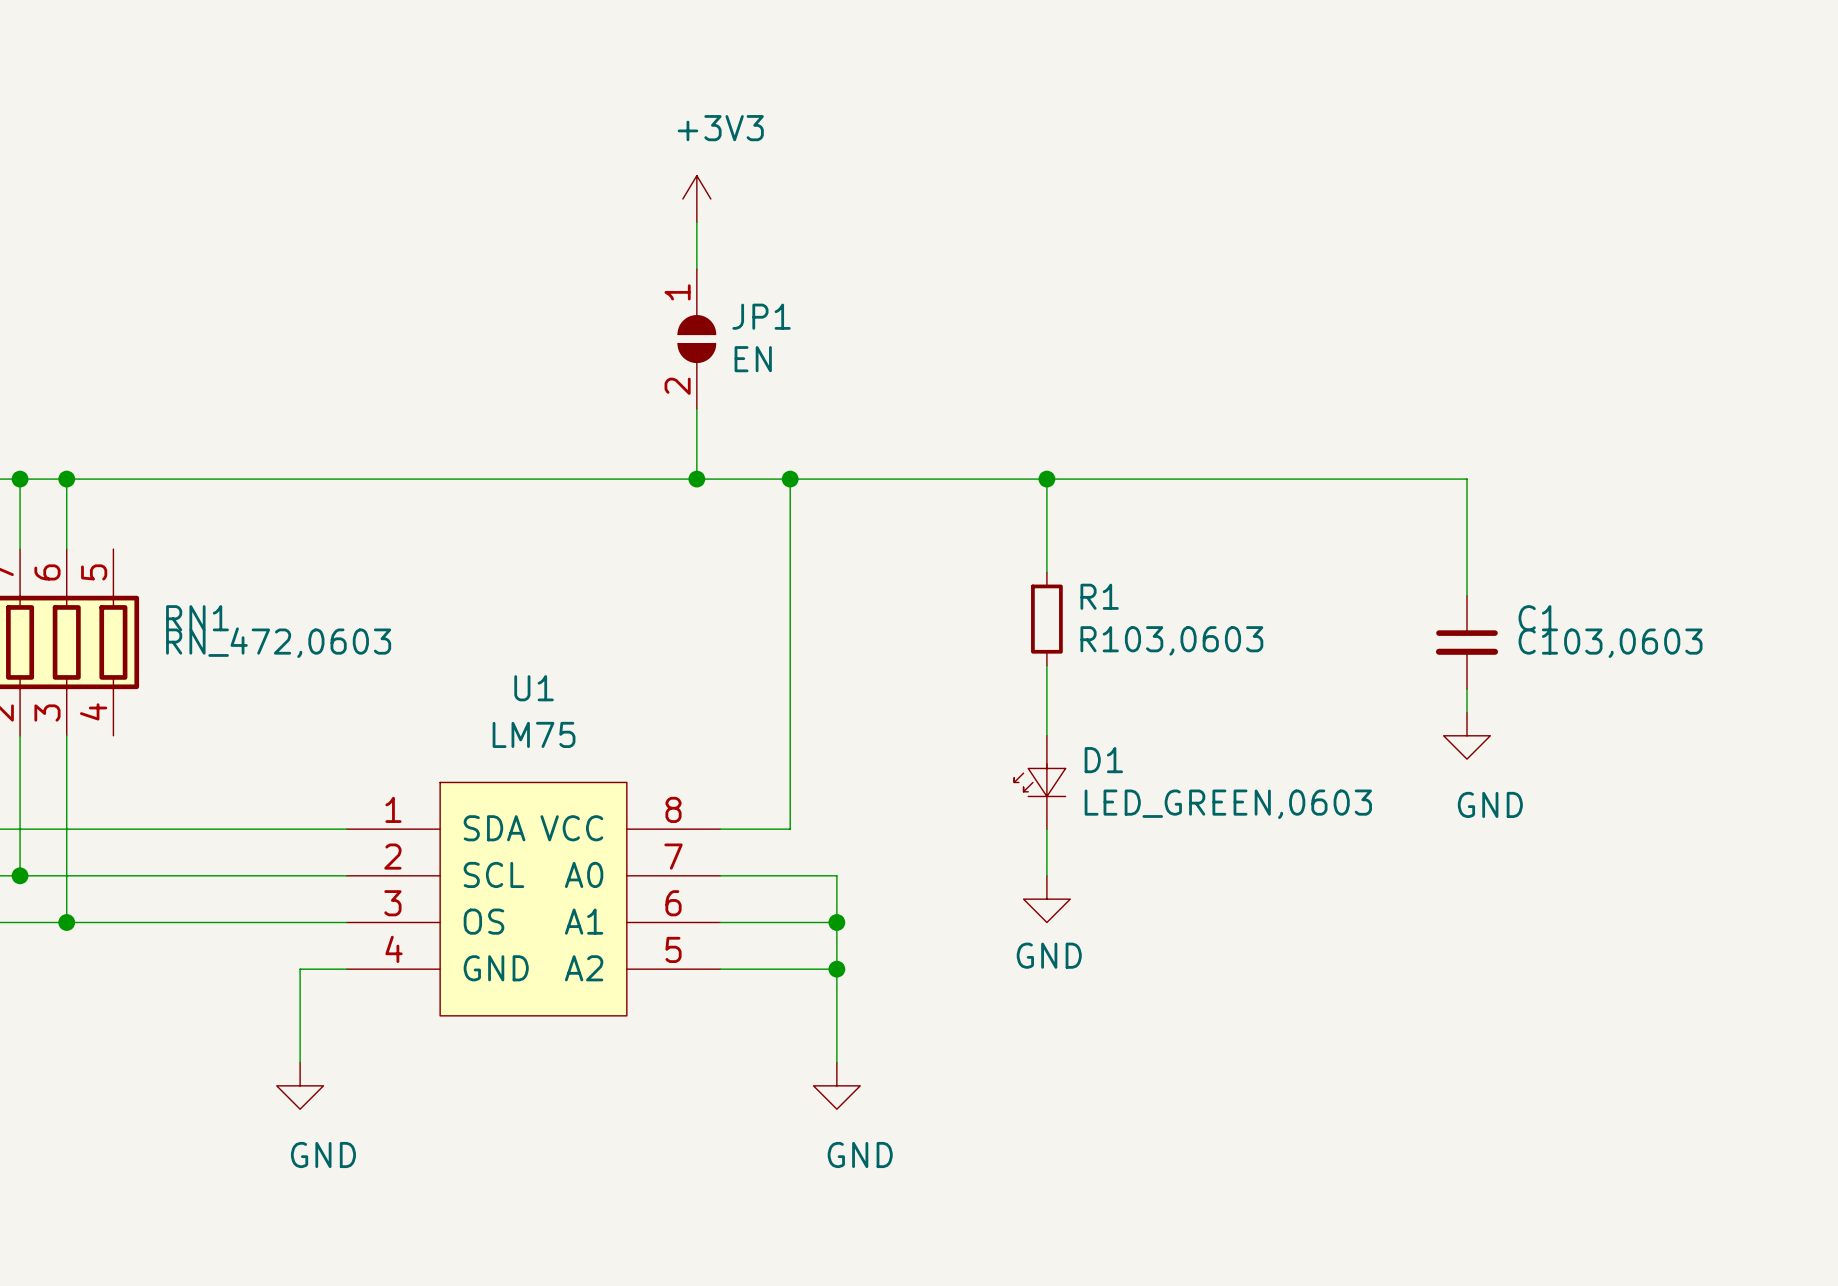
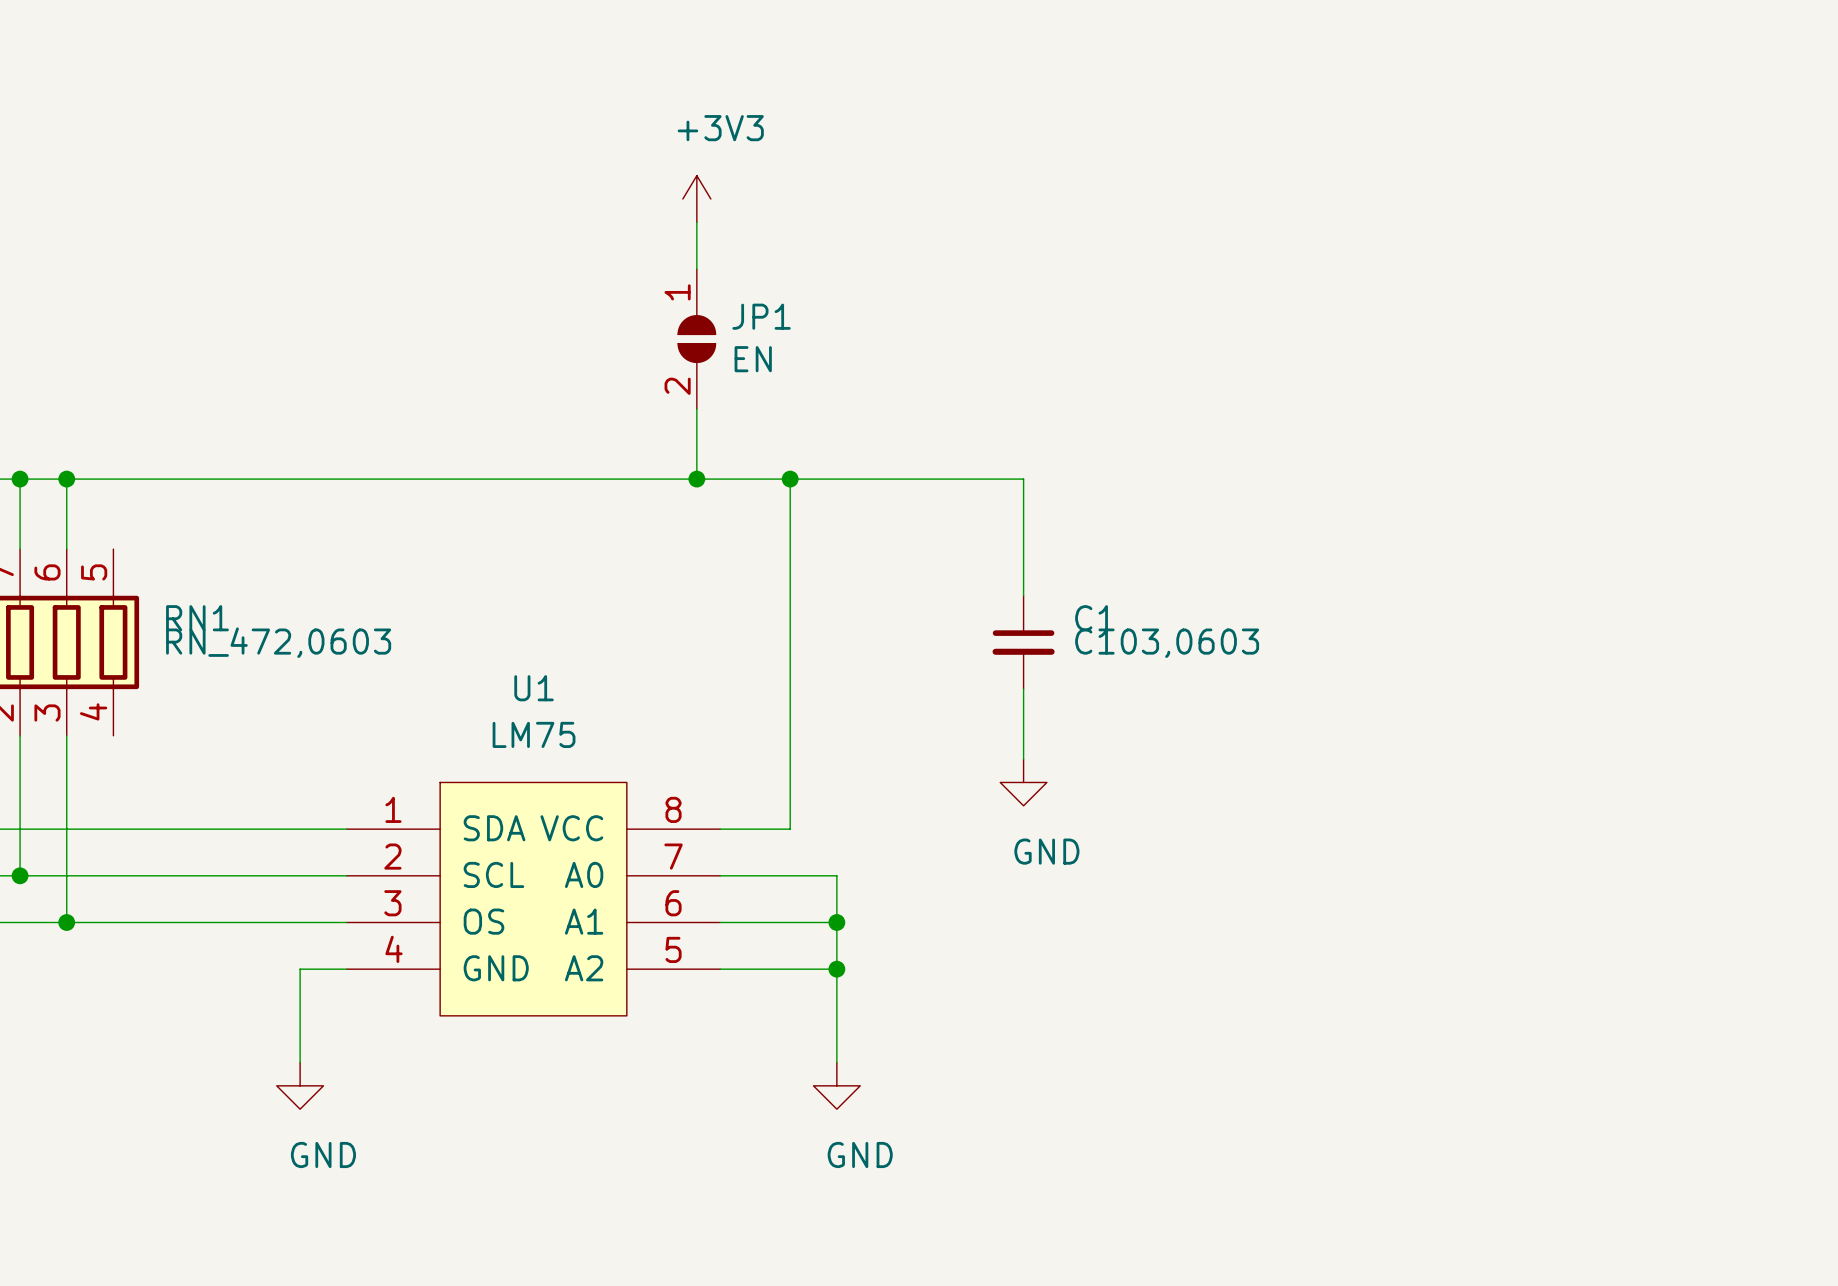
wire: (1023, 479) (1466, 479) (1466, 595) -> (1023, 479) (1023, 595)
wire: (1046, 479) (1046, 572) -> none
junction: (1046, 479) -> none
R1: R103,0603 (1046, 619) -> none
C1 position: (1466, 642) -> (1023, 642)
wire: (1046, 665) (1046, 735) -> (1023, 689) (1023, 759)
wire: (1466, 689) (1466, 712) -> none
power symbol: GND (1466, 735) -> none
D1: LED_GREEN,0603 (1039, 782) -> none
wire: (1046, 829) (1046, 875) -> none
power symbol position: GND (1046, 899) -> GND (1023, 782)
power symbol text position: GND (1049, 955) -> GND (1046, 851)

